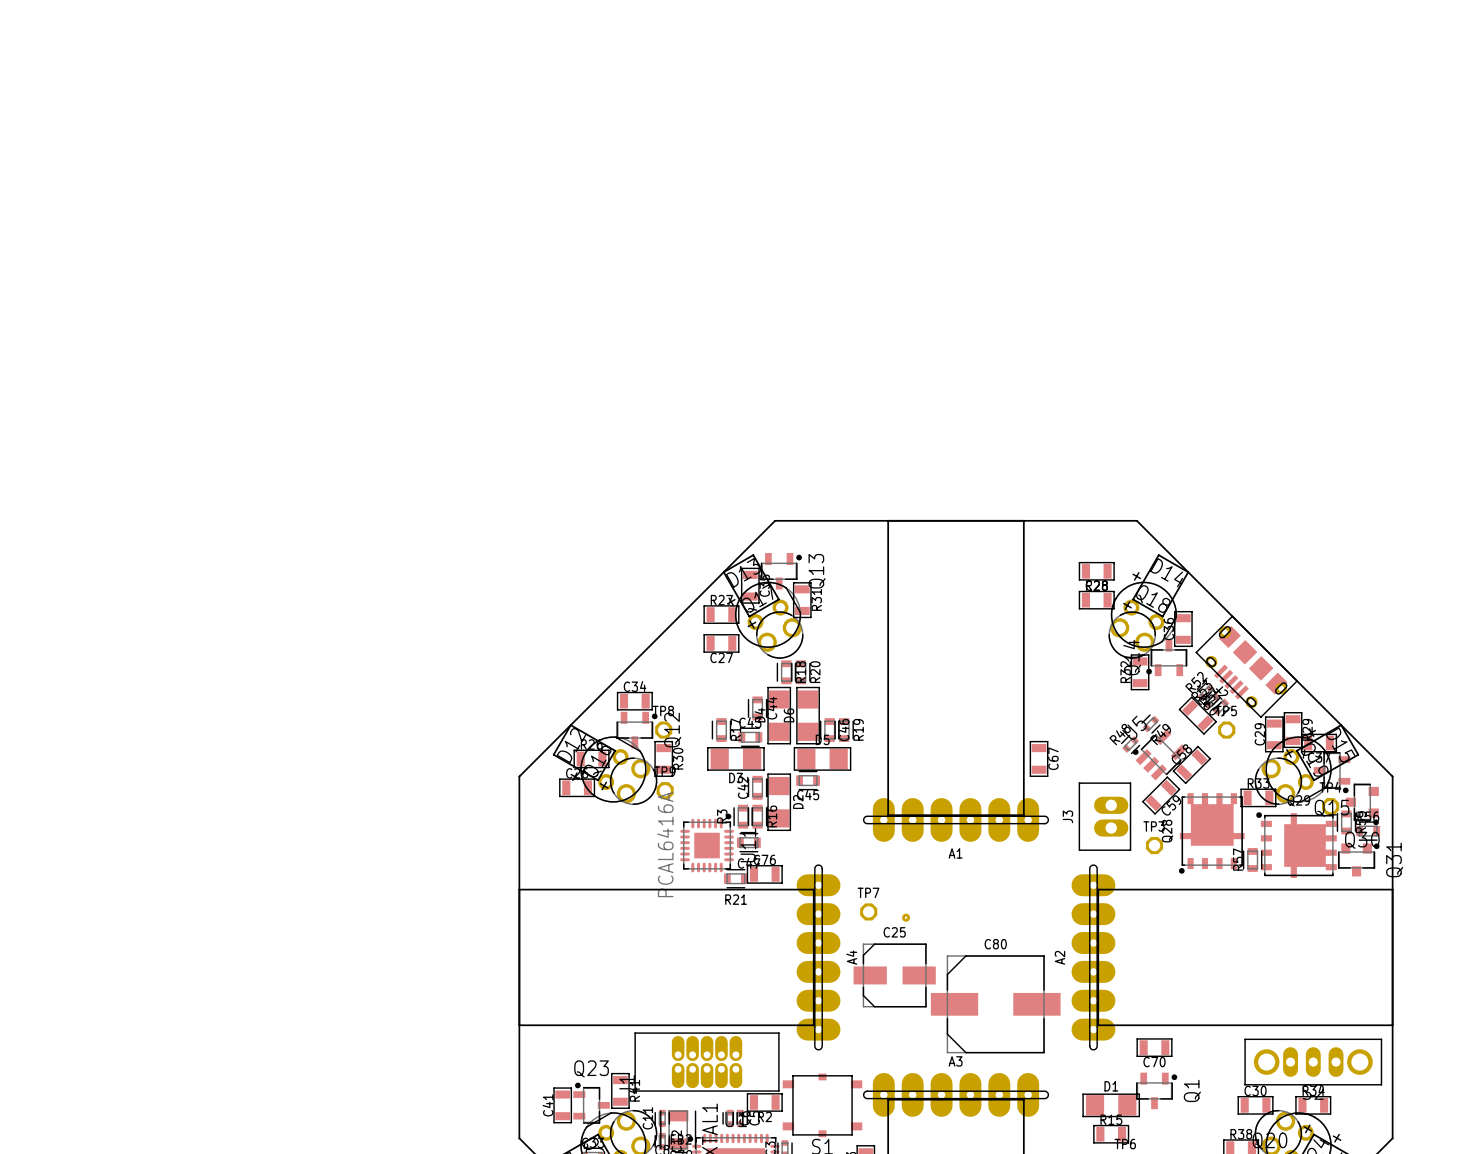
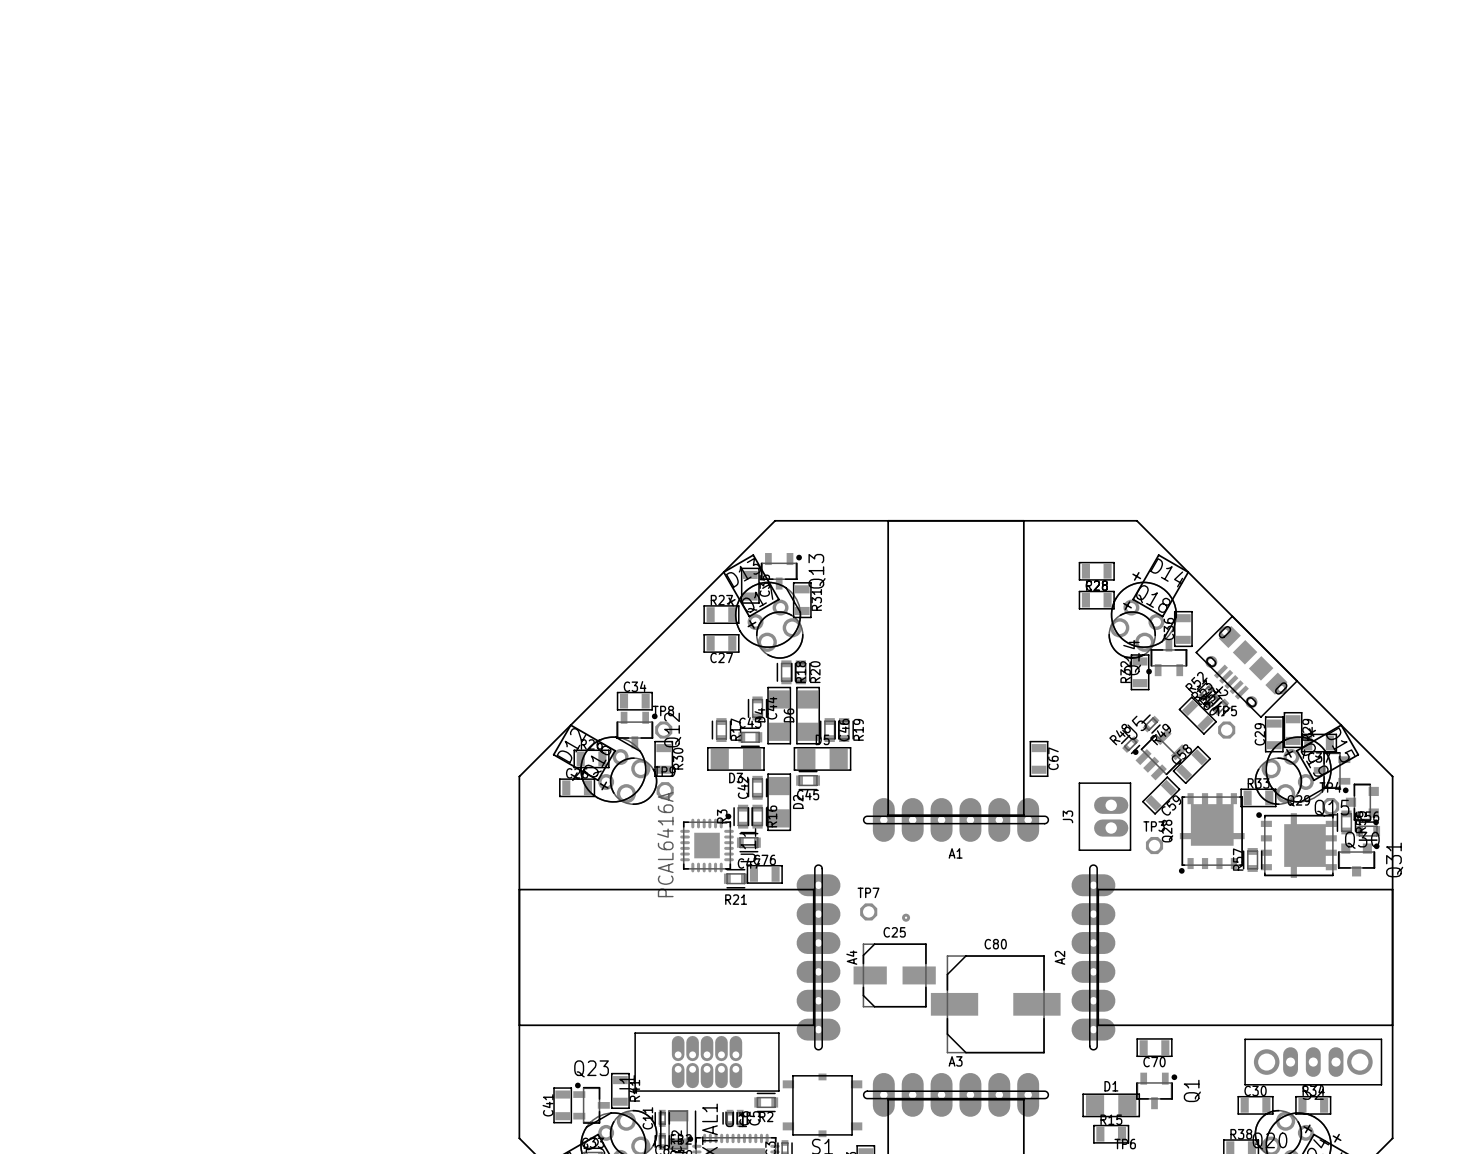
R2 footprint: [747, 1093, 783, 1112] -> [754, 1092, 779, 1113]

